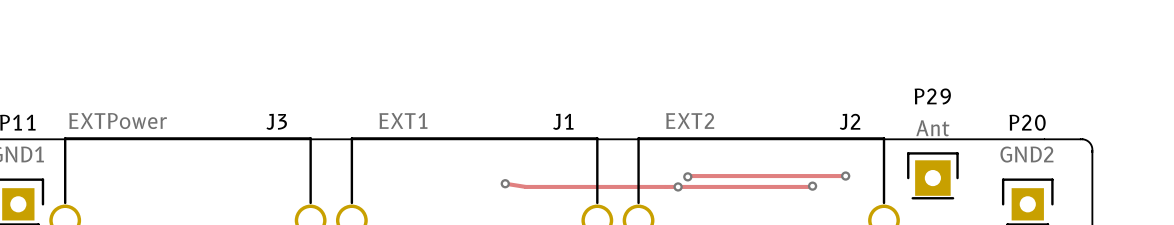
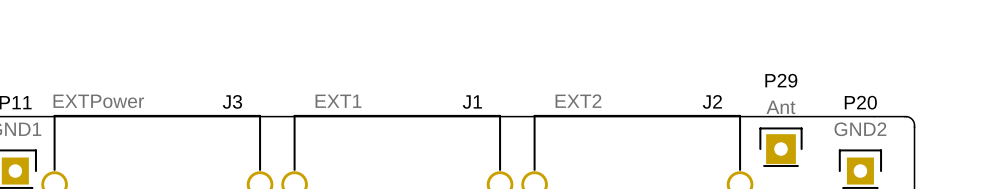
via: (687, 176) -> none
track: (845, 176) (687, 176) -> none
via: (845, 176) -> none
track: (505, 183) (525, 186) (812, 186) -> none
via: (505, 183) -> none
via: (678, 186) -> none
via: (812, 186) -> none

